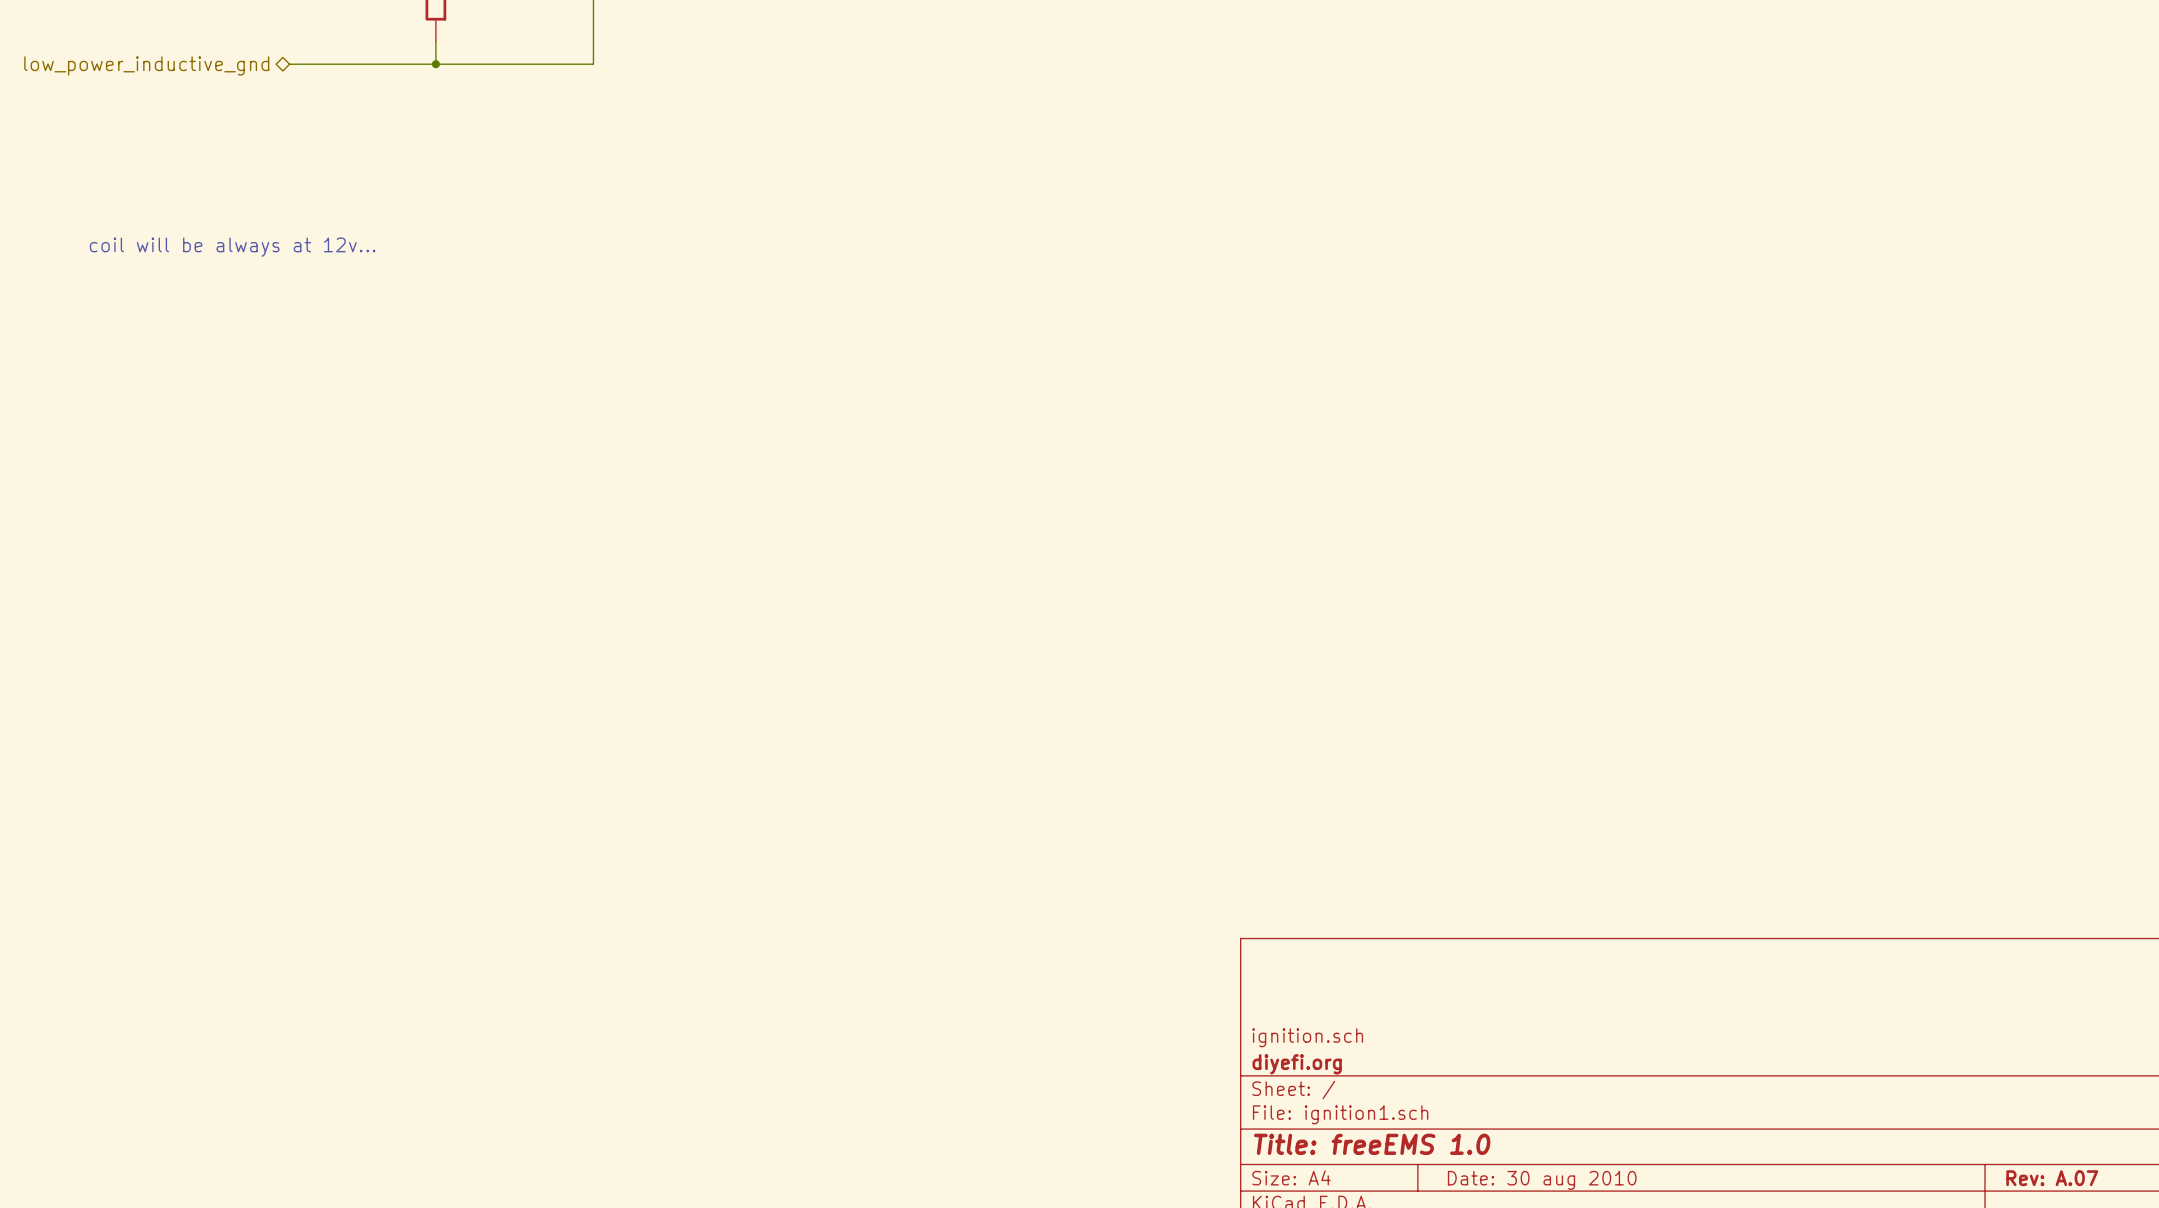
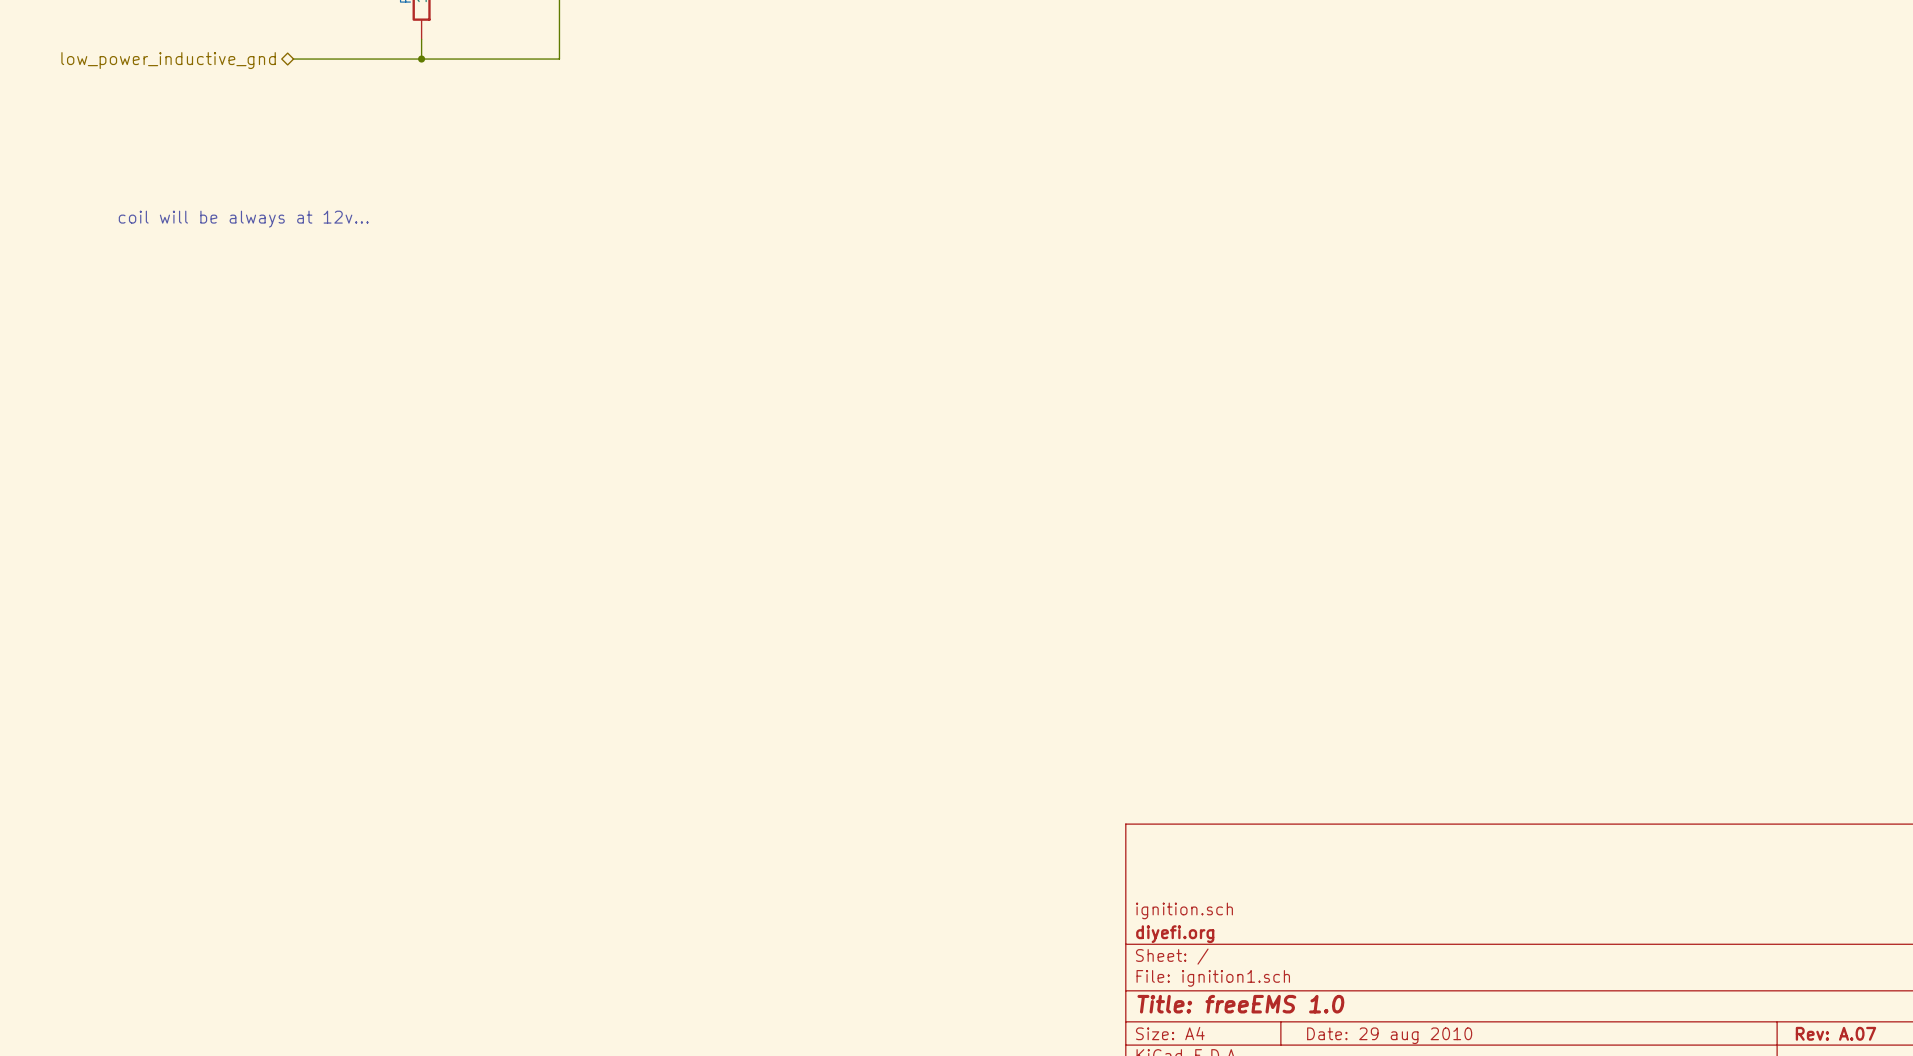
title block: Date: 30 aug 2010 (1542, 1180) -> Date: 29 aug 2010 (1389, 1035)

